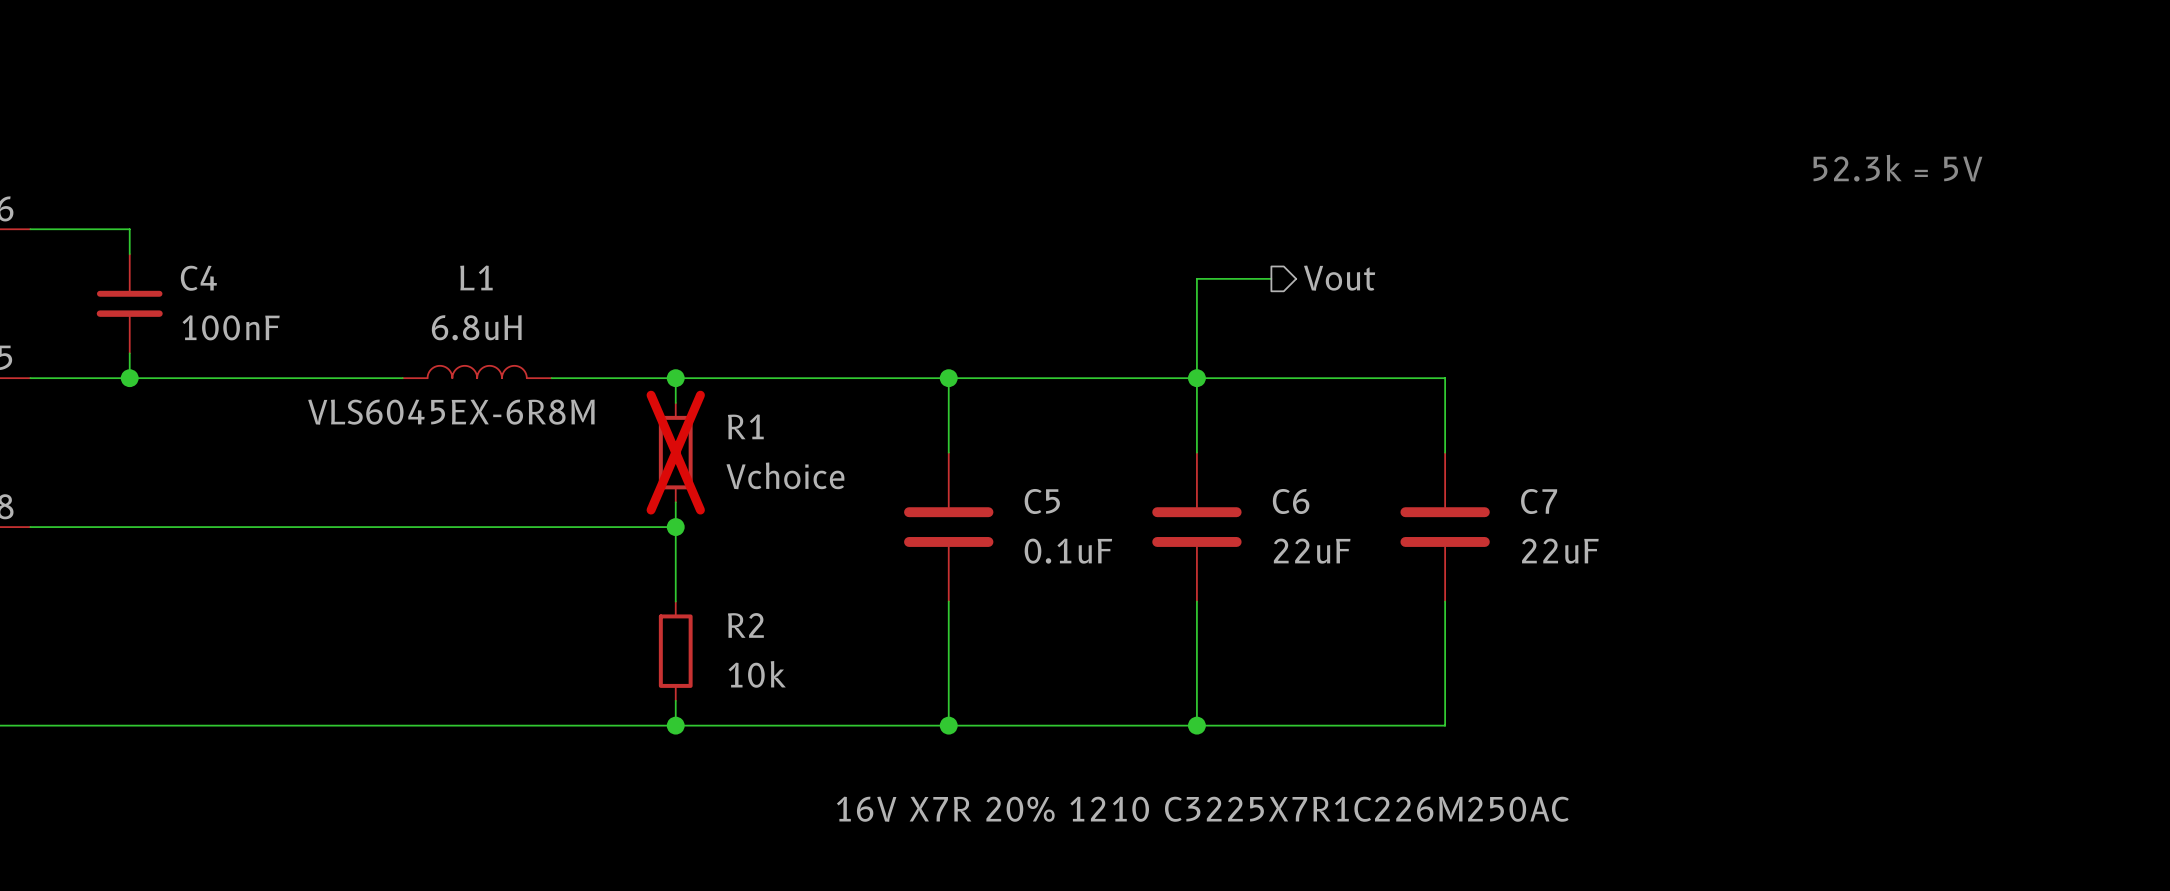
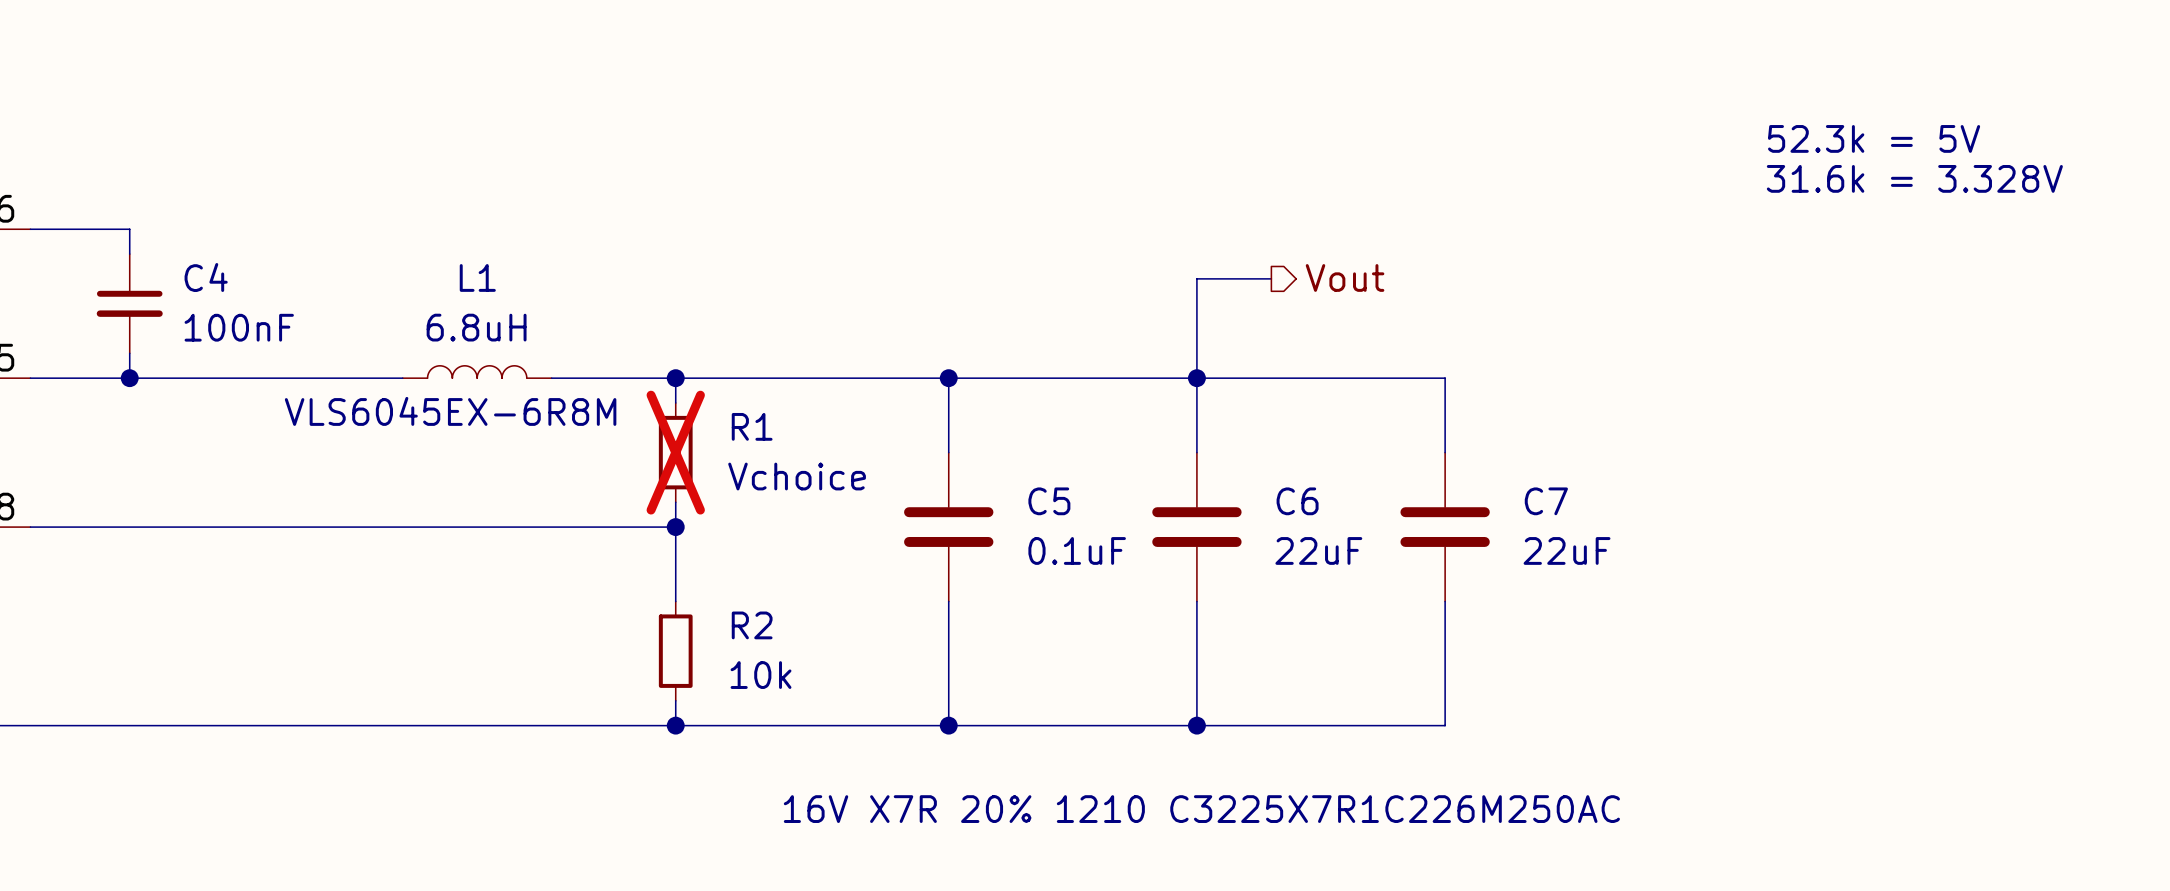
text position: 52.3k = 5V (1897, 168) -> 52.3k = 5V (1874, 138)
text: none -> 31.6k = 3.328V (1914, 178)

